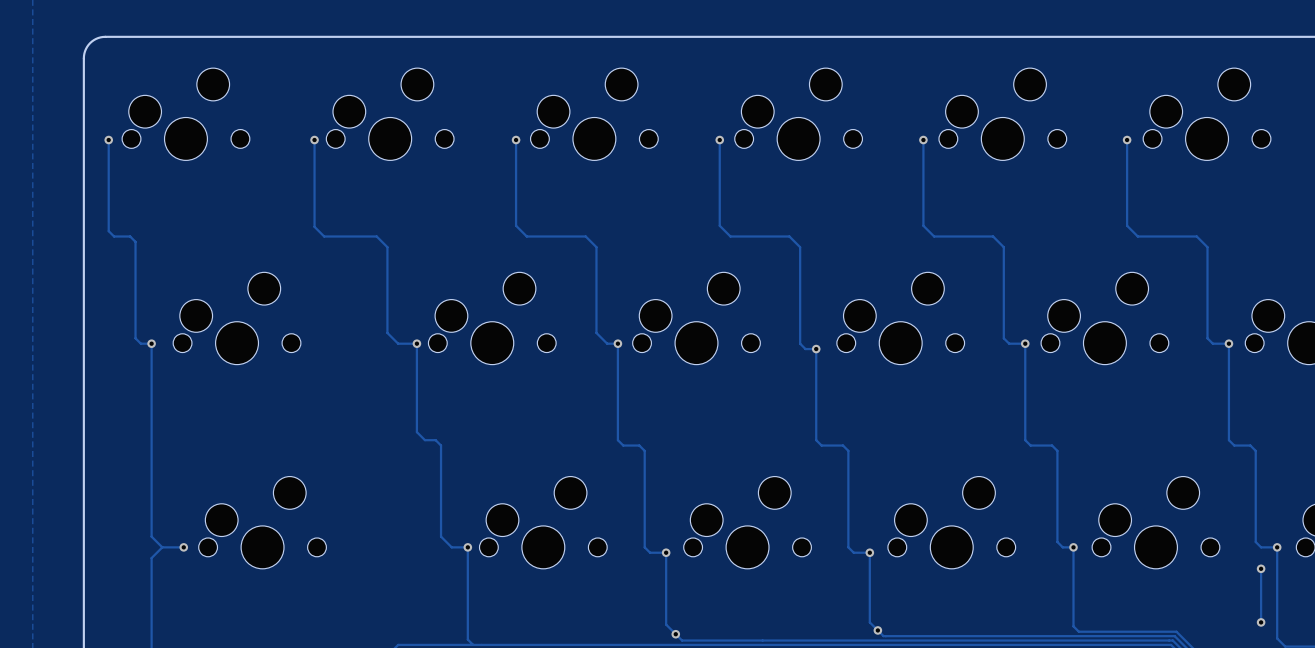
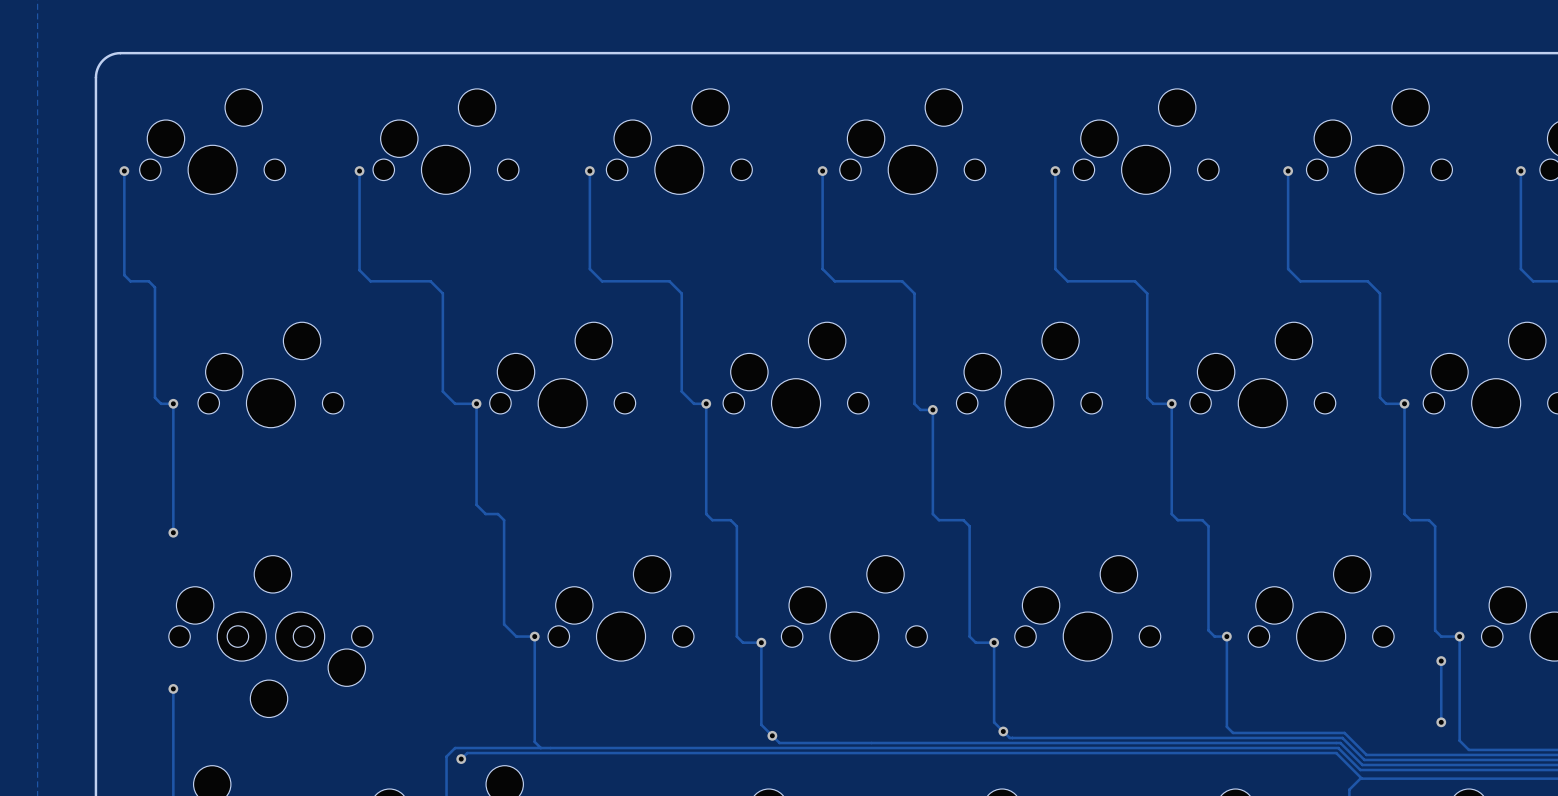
track: (151, 456) (151, 536) (162, 547) -> none
via: none -> (173, 532)
part: none -> (241, 608)
part: (262, 522) -> none
track: (162, 547) (183, 547) -> none
track: (162, 547) (151, 558) (151, 593) -> none
via: (183, 547) -> none
part: none -> (300, 664)
via: none -> (173, 688)

